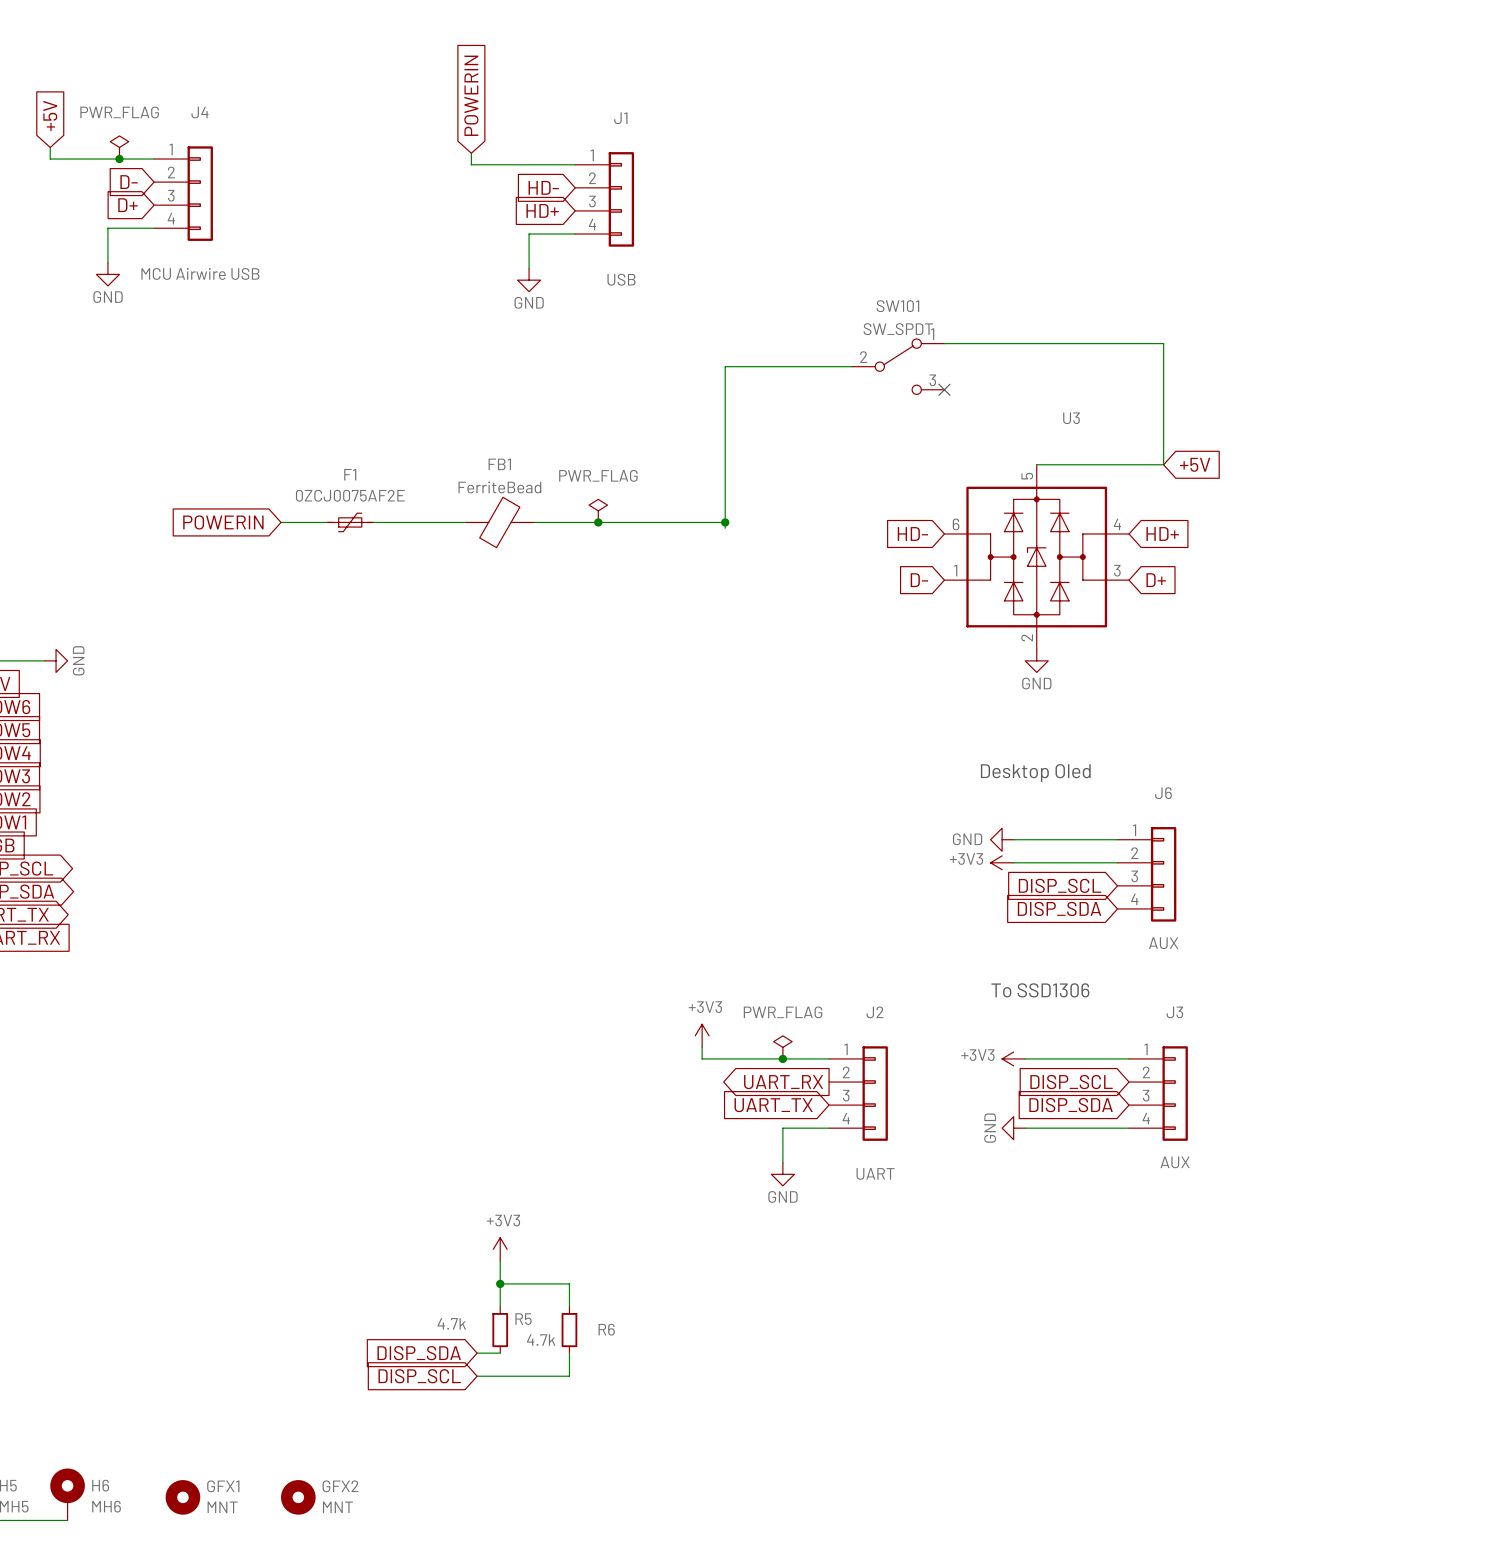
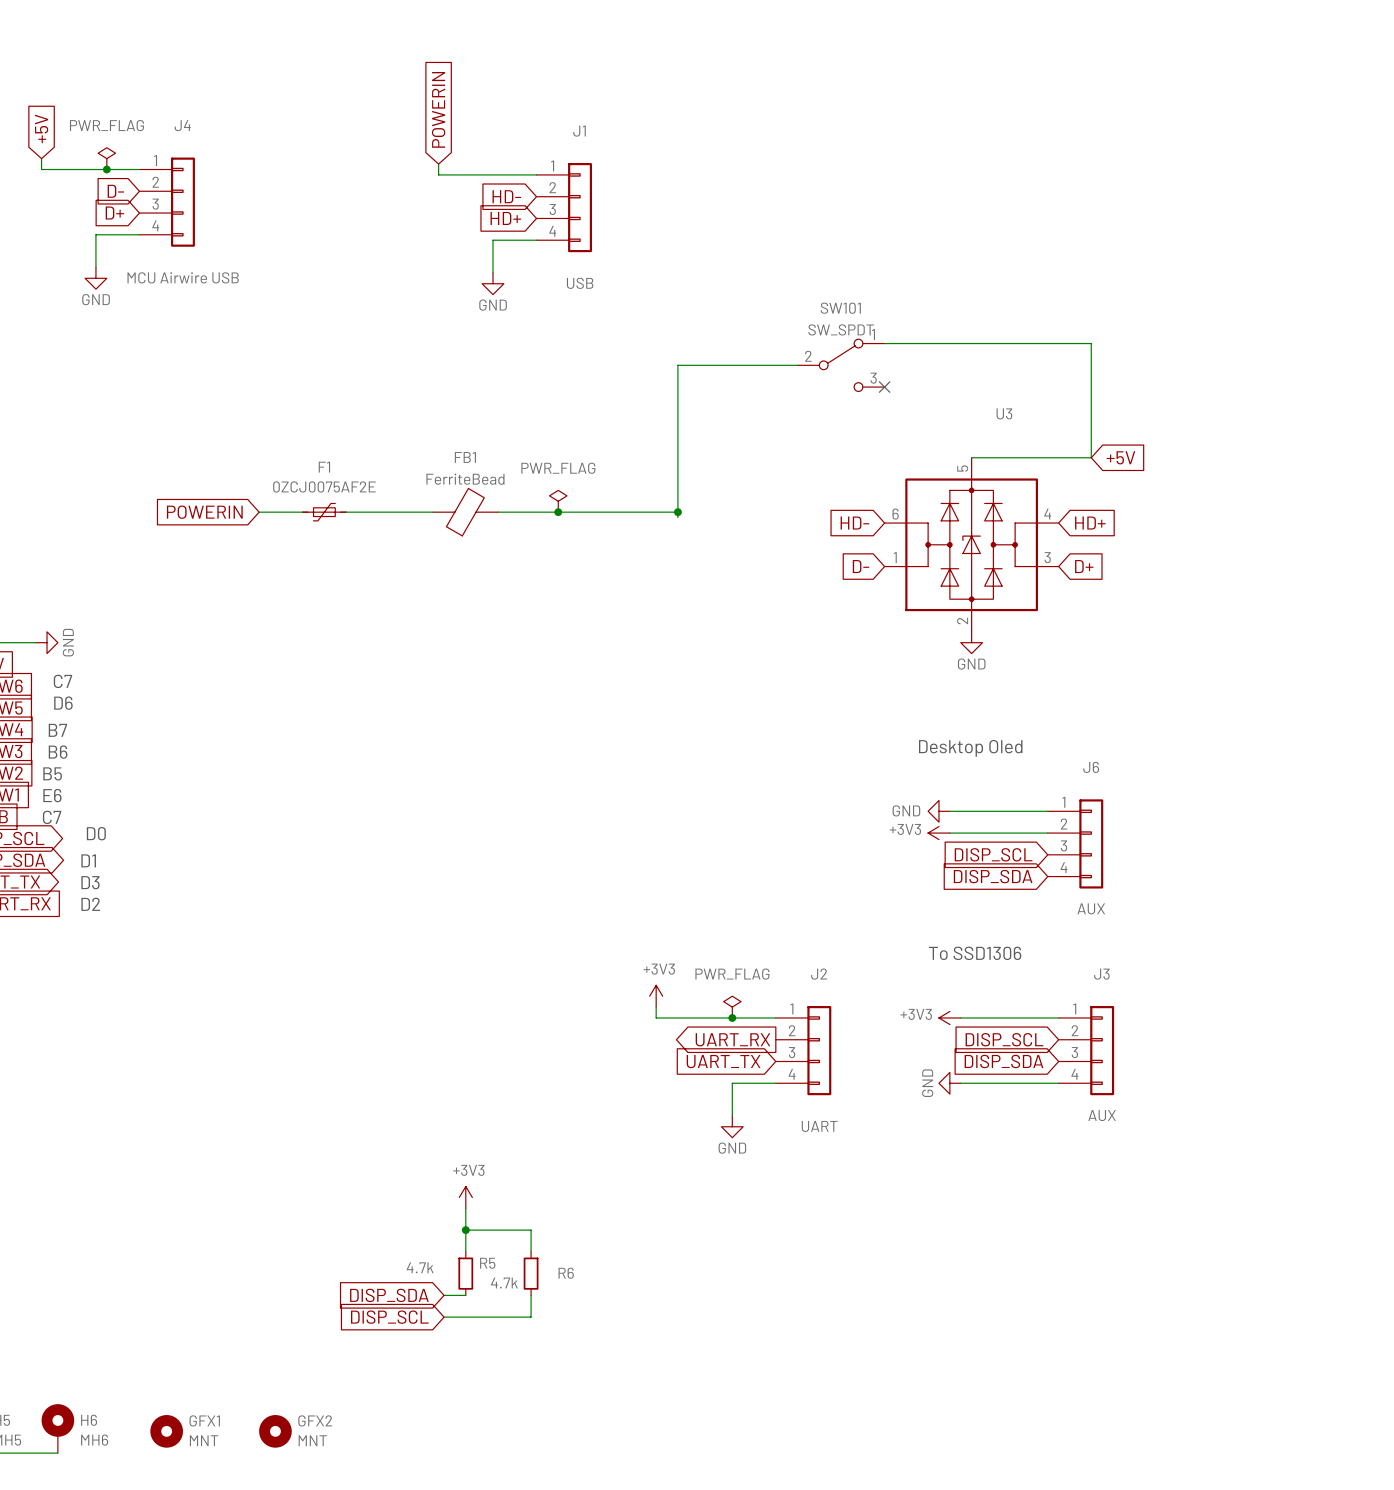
text: none -> C7 (62, 681)
text: none -> D6 (63, 703)
text: none -> B7 (57, 730)
text: none -> B6 (58, 752)
text: none -> B5 (52, 773)
text: none -> E6 (52, 795)
text: none -> C7 (52, 817)
text: none -> D0 (96, 833)
text: none -> D1 (88, 860)
text: none -> D3 (90, 882)
text: none -> D2 (90, 904)

